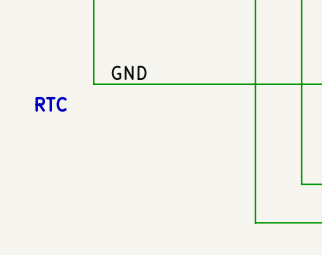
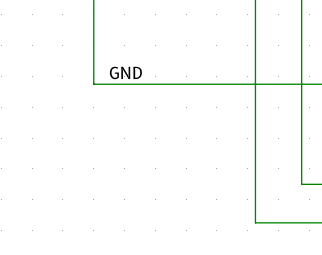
text: RTC (51, 104) -> none

